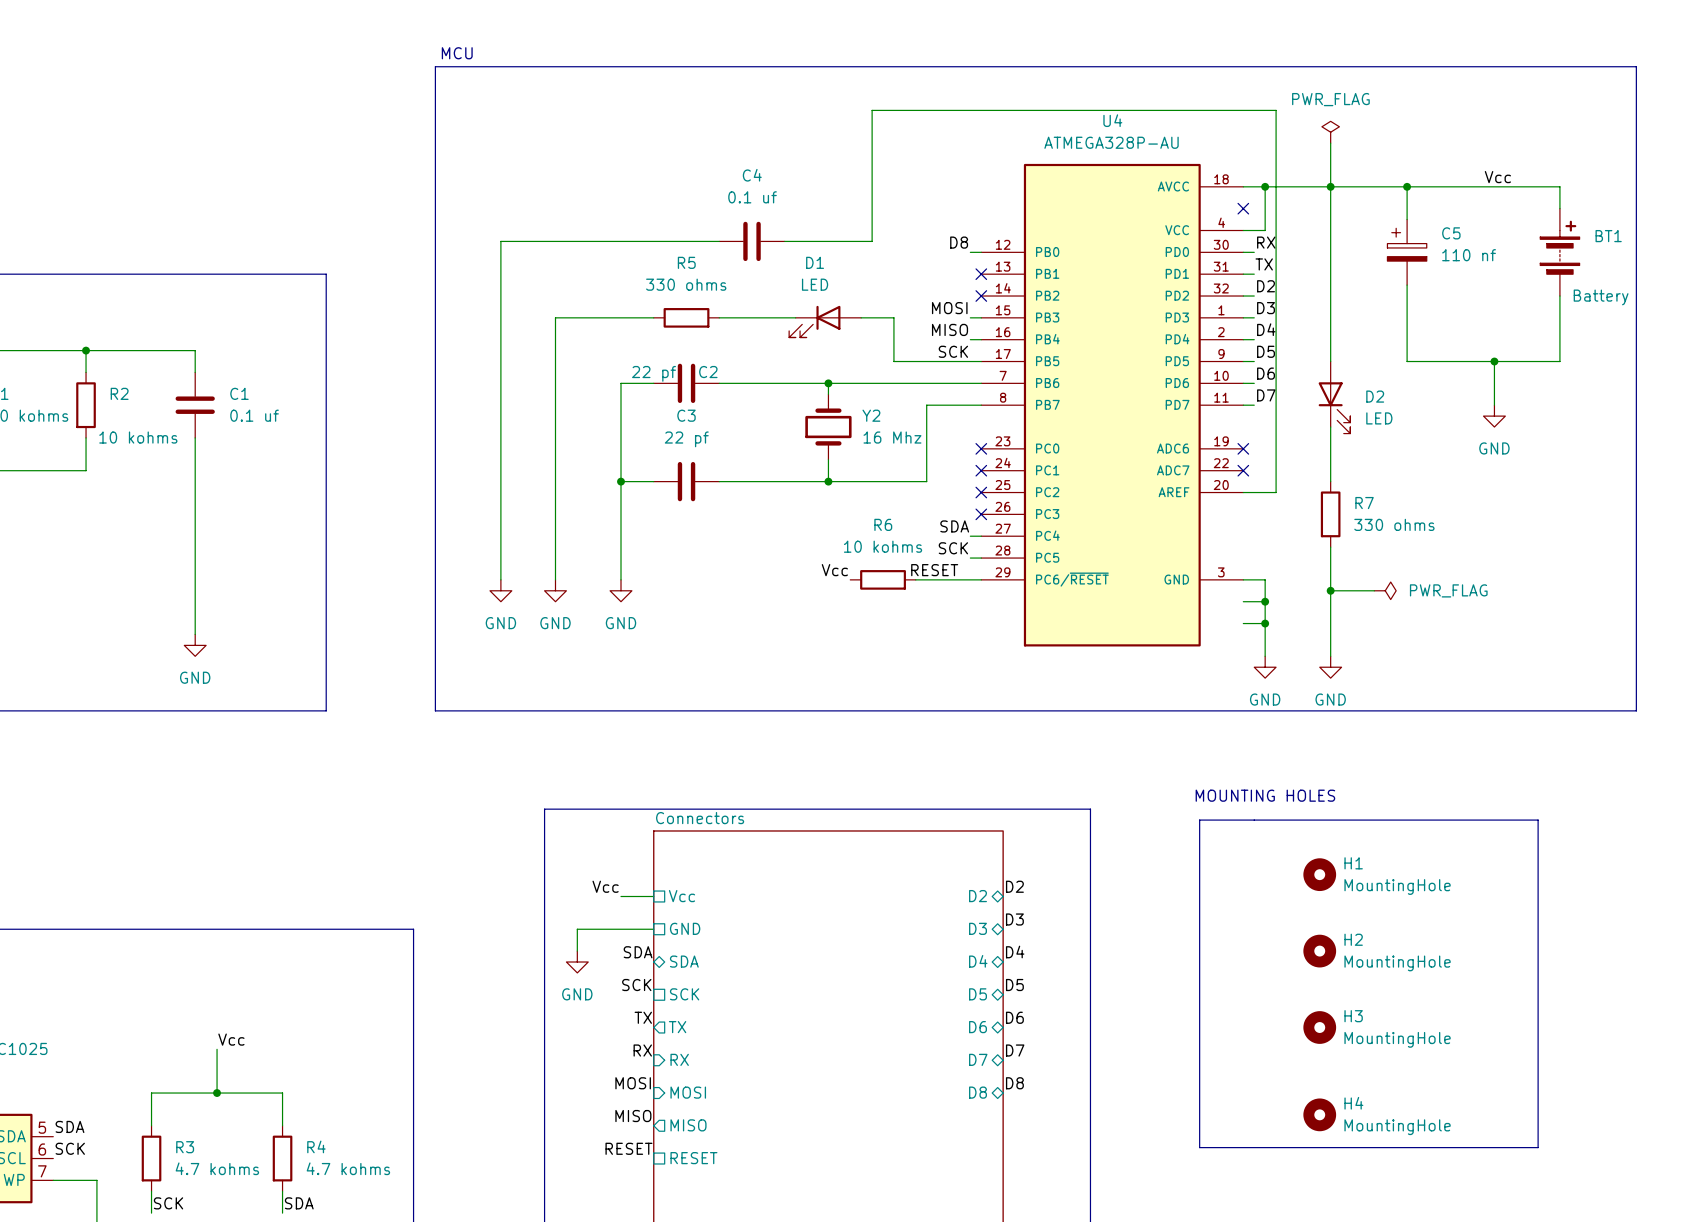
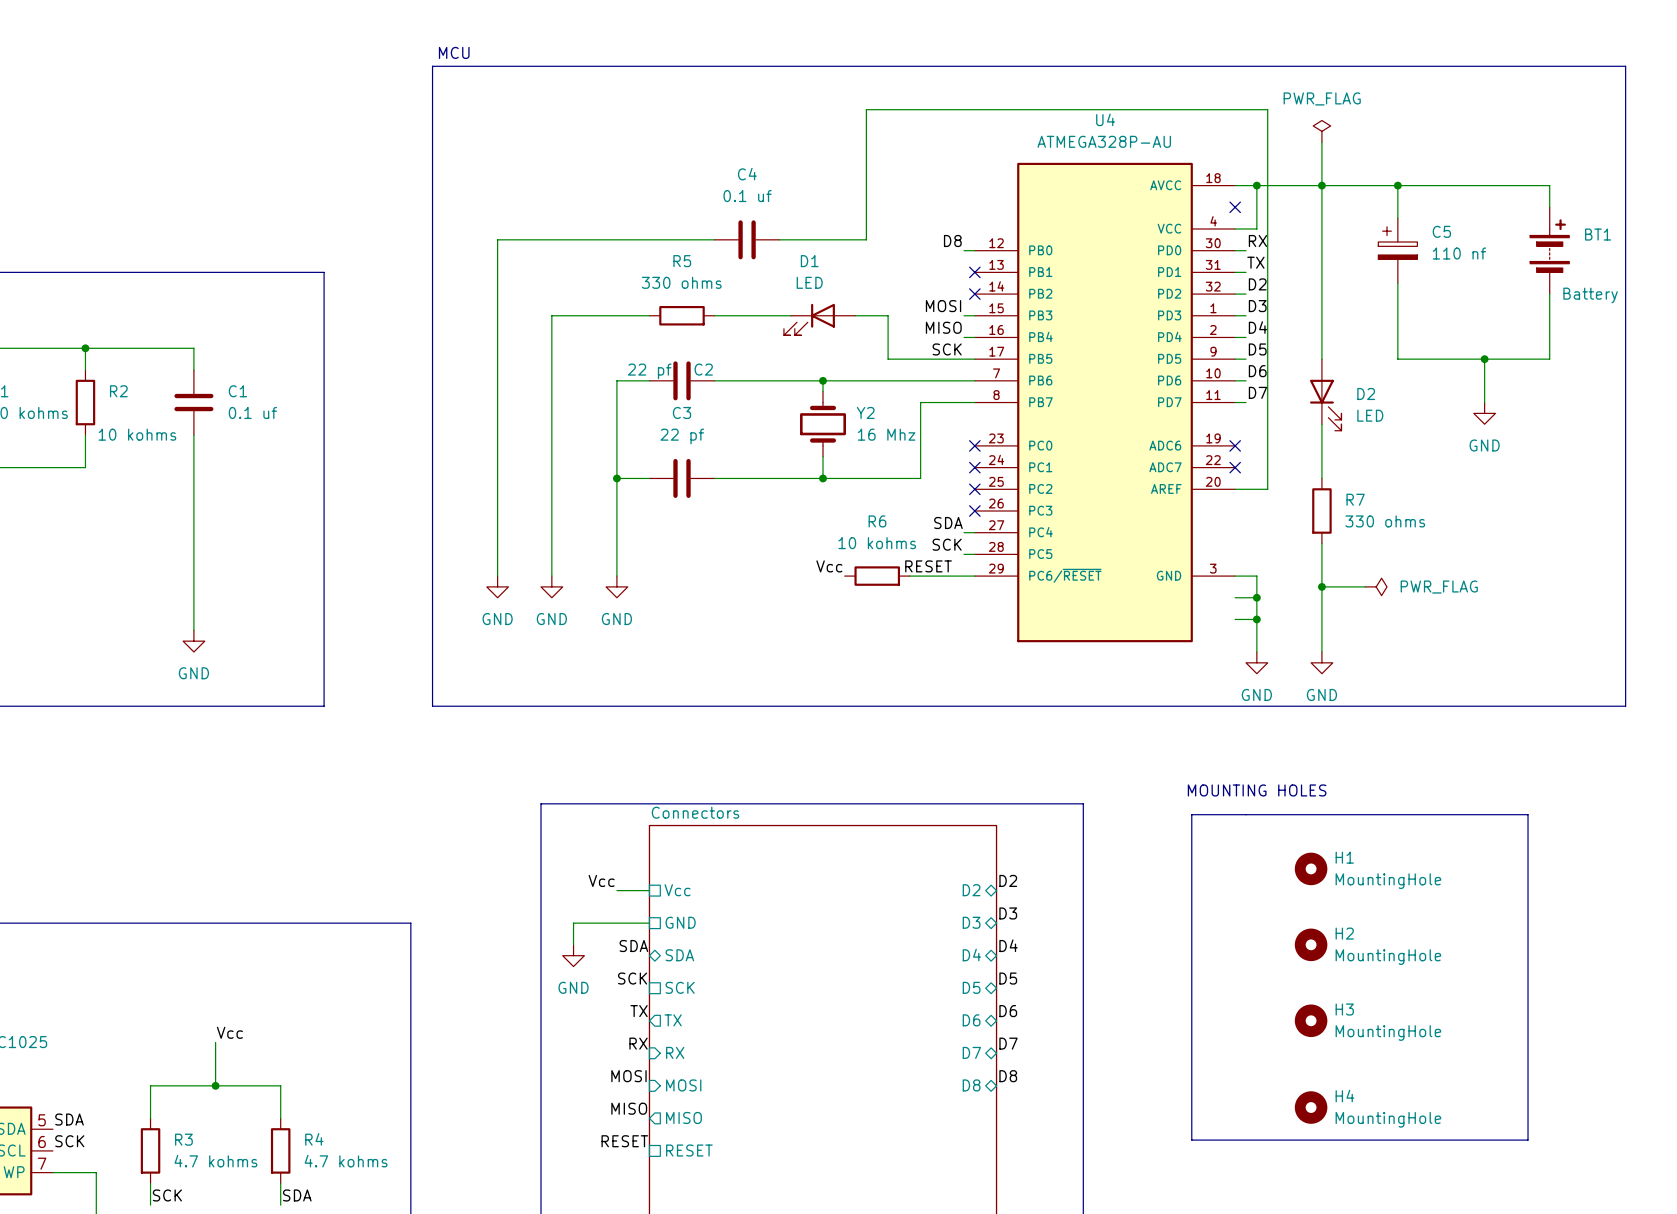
label: Vcc (1497, 177) -> none

